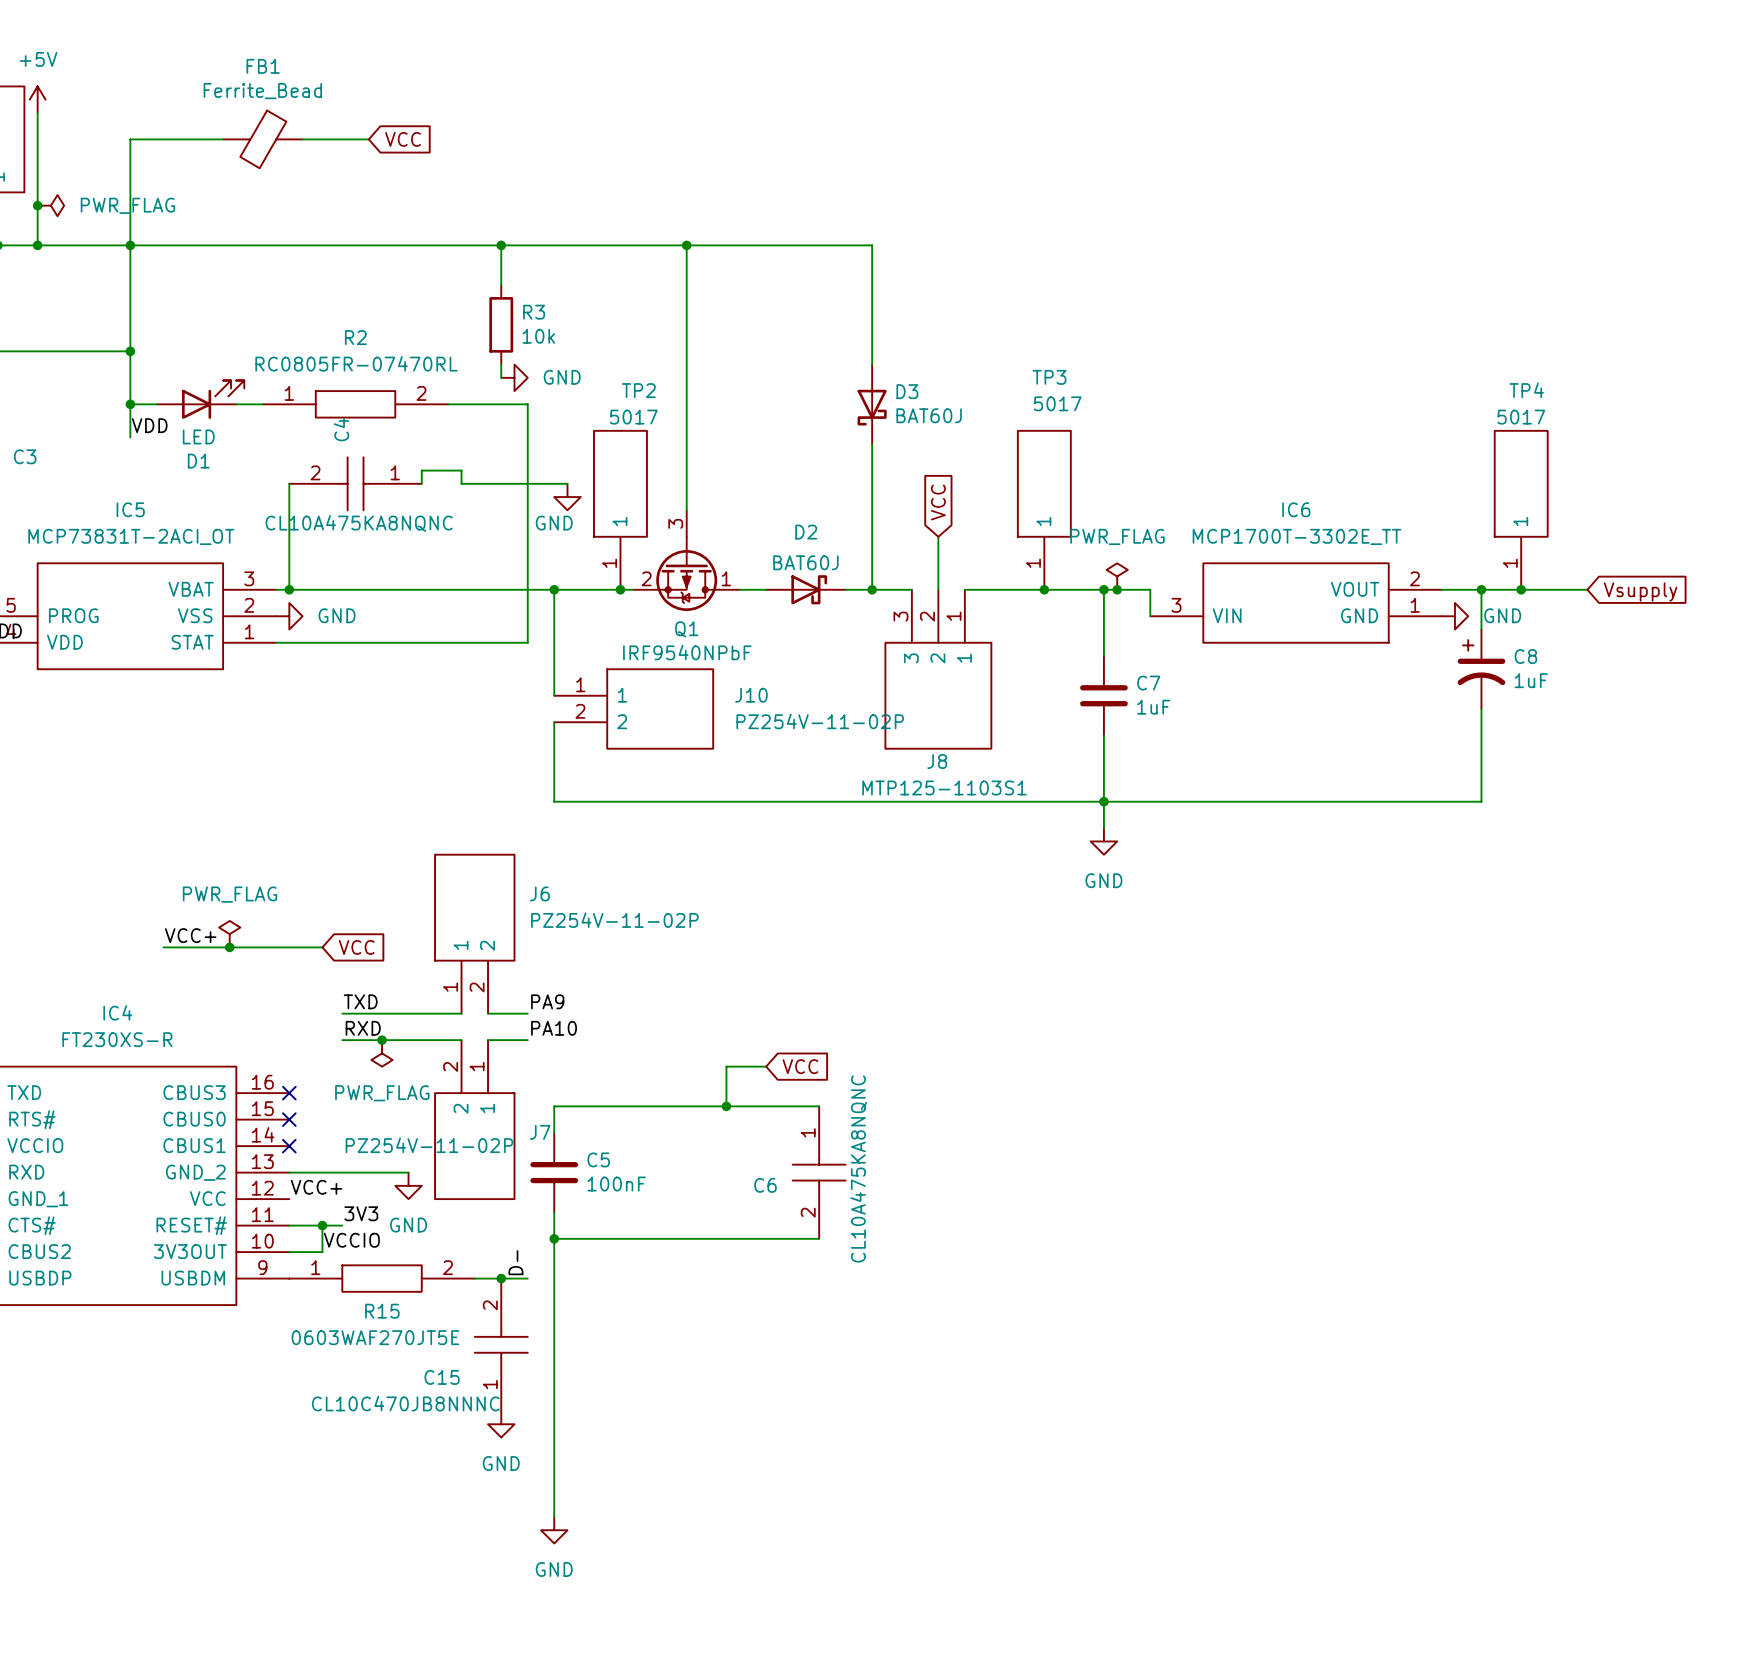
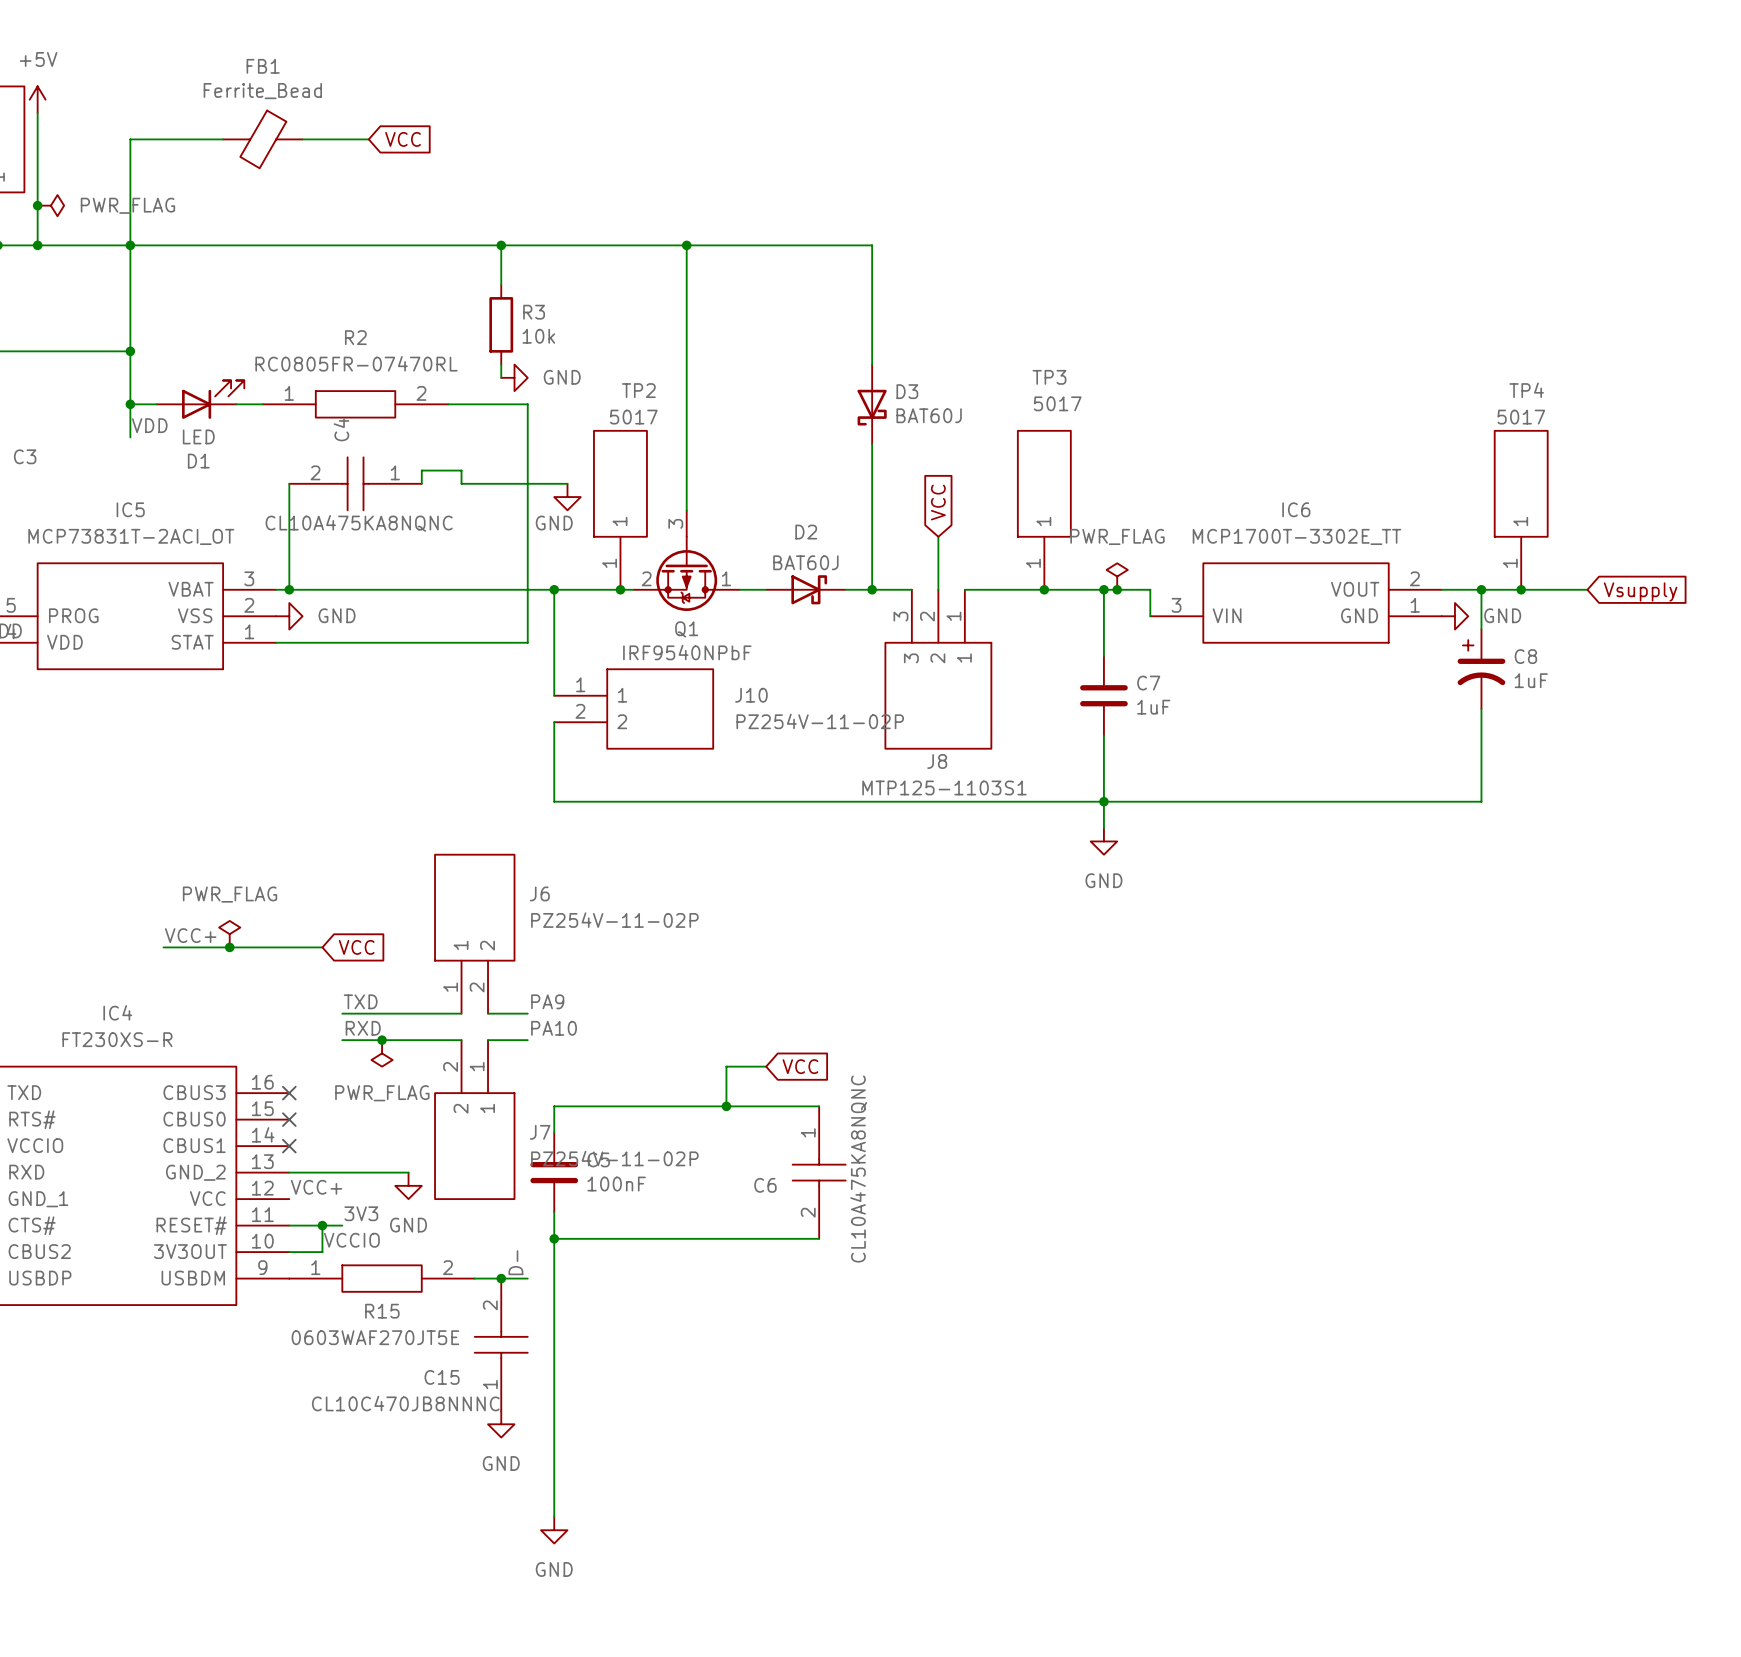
J7 value position: PZ254V-11-02P (429, 1145) -> PZ254V-11-02P (614, 1158)

